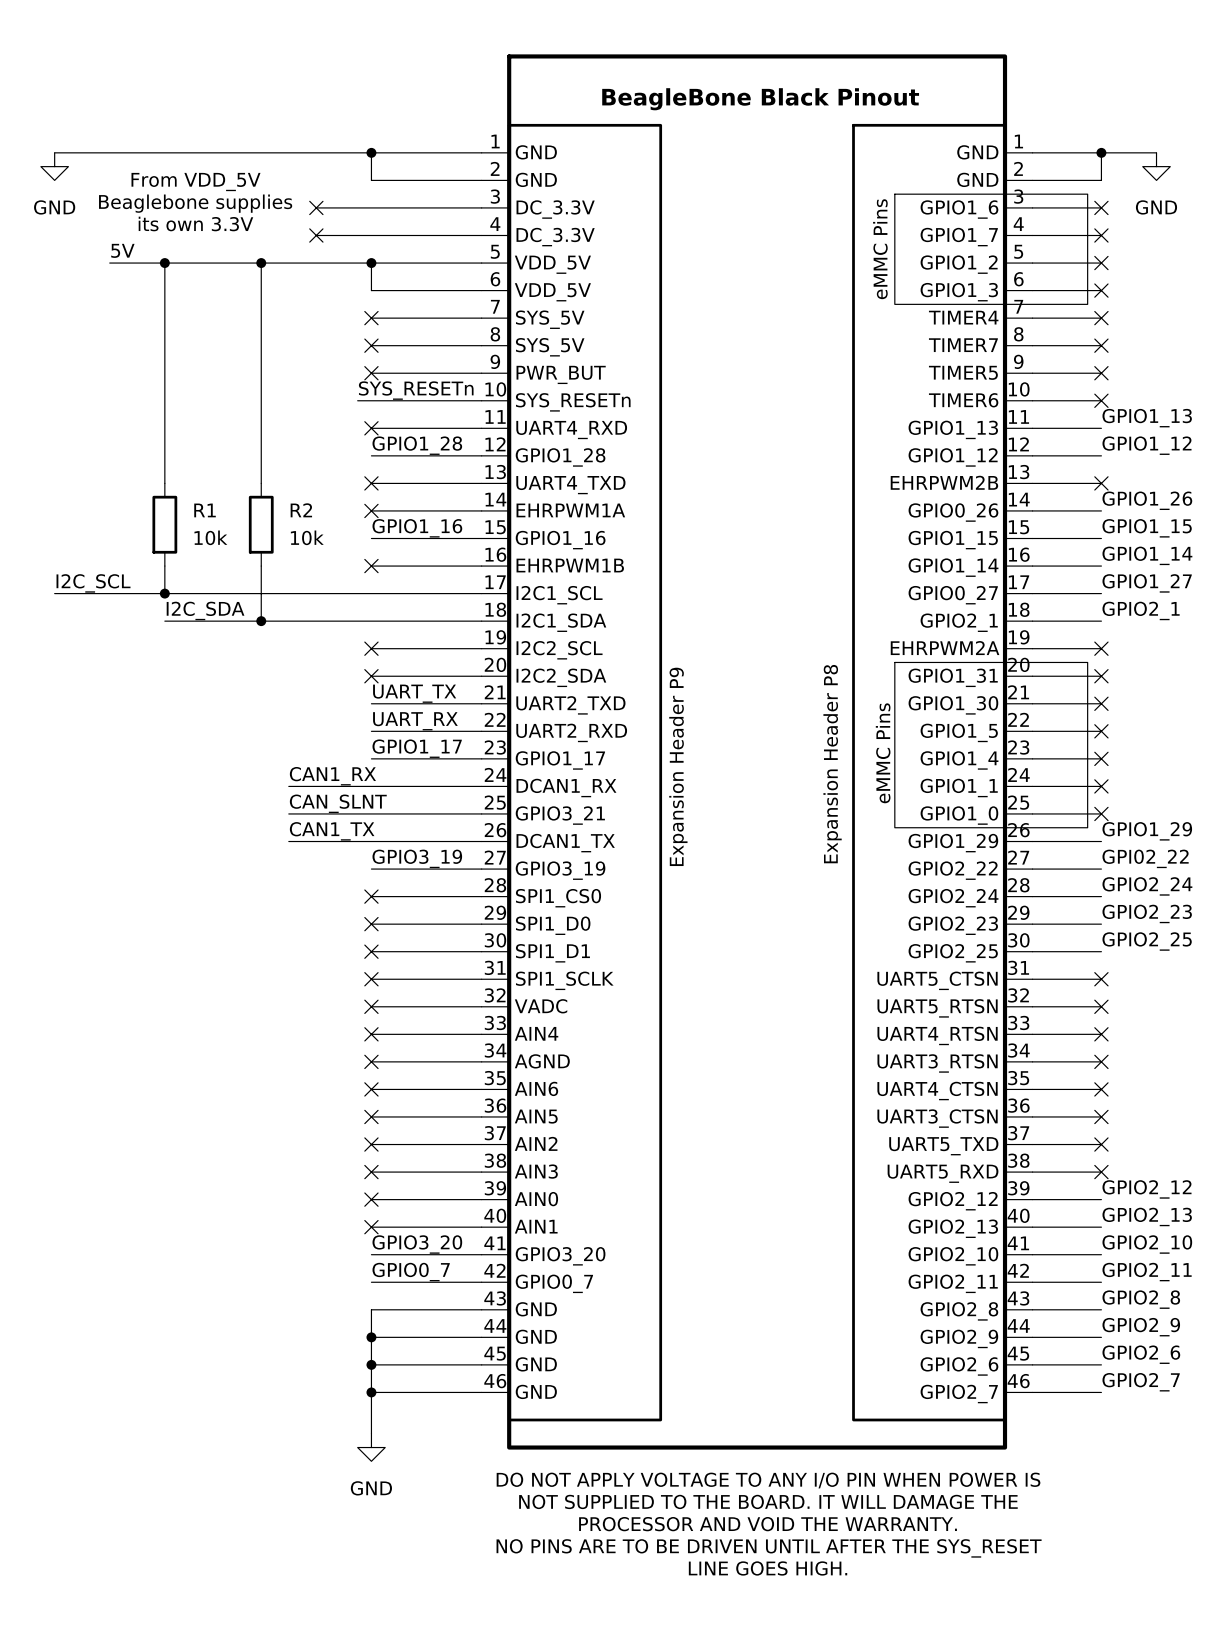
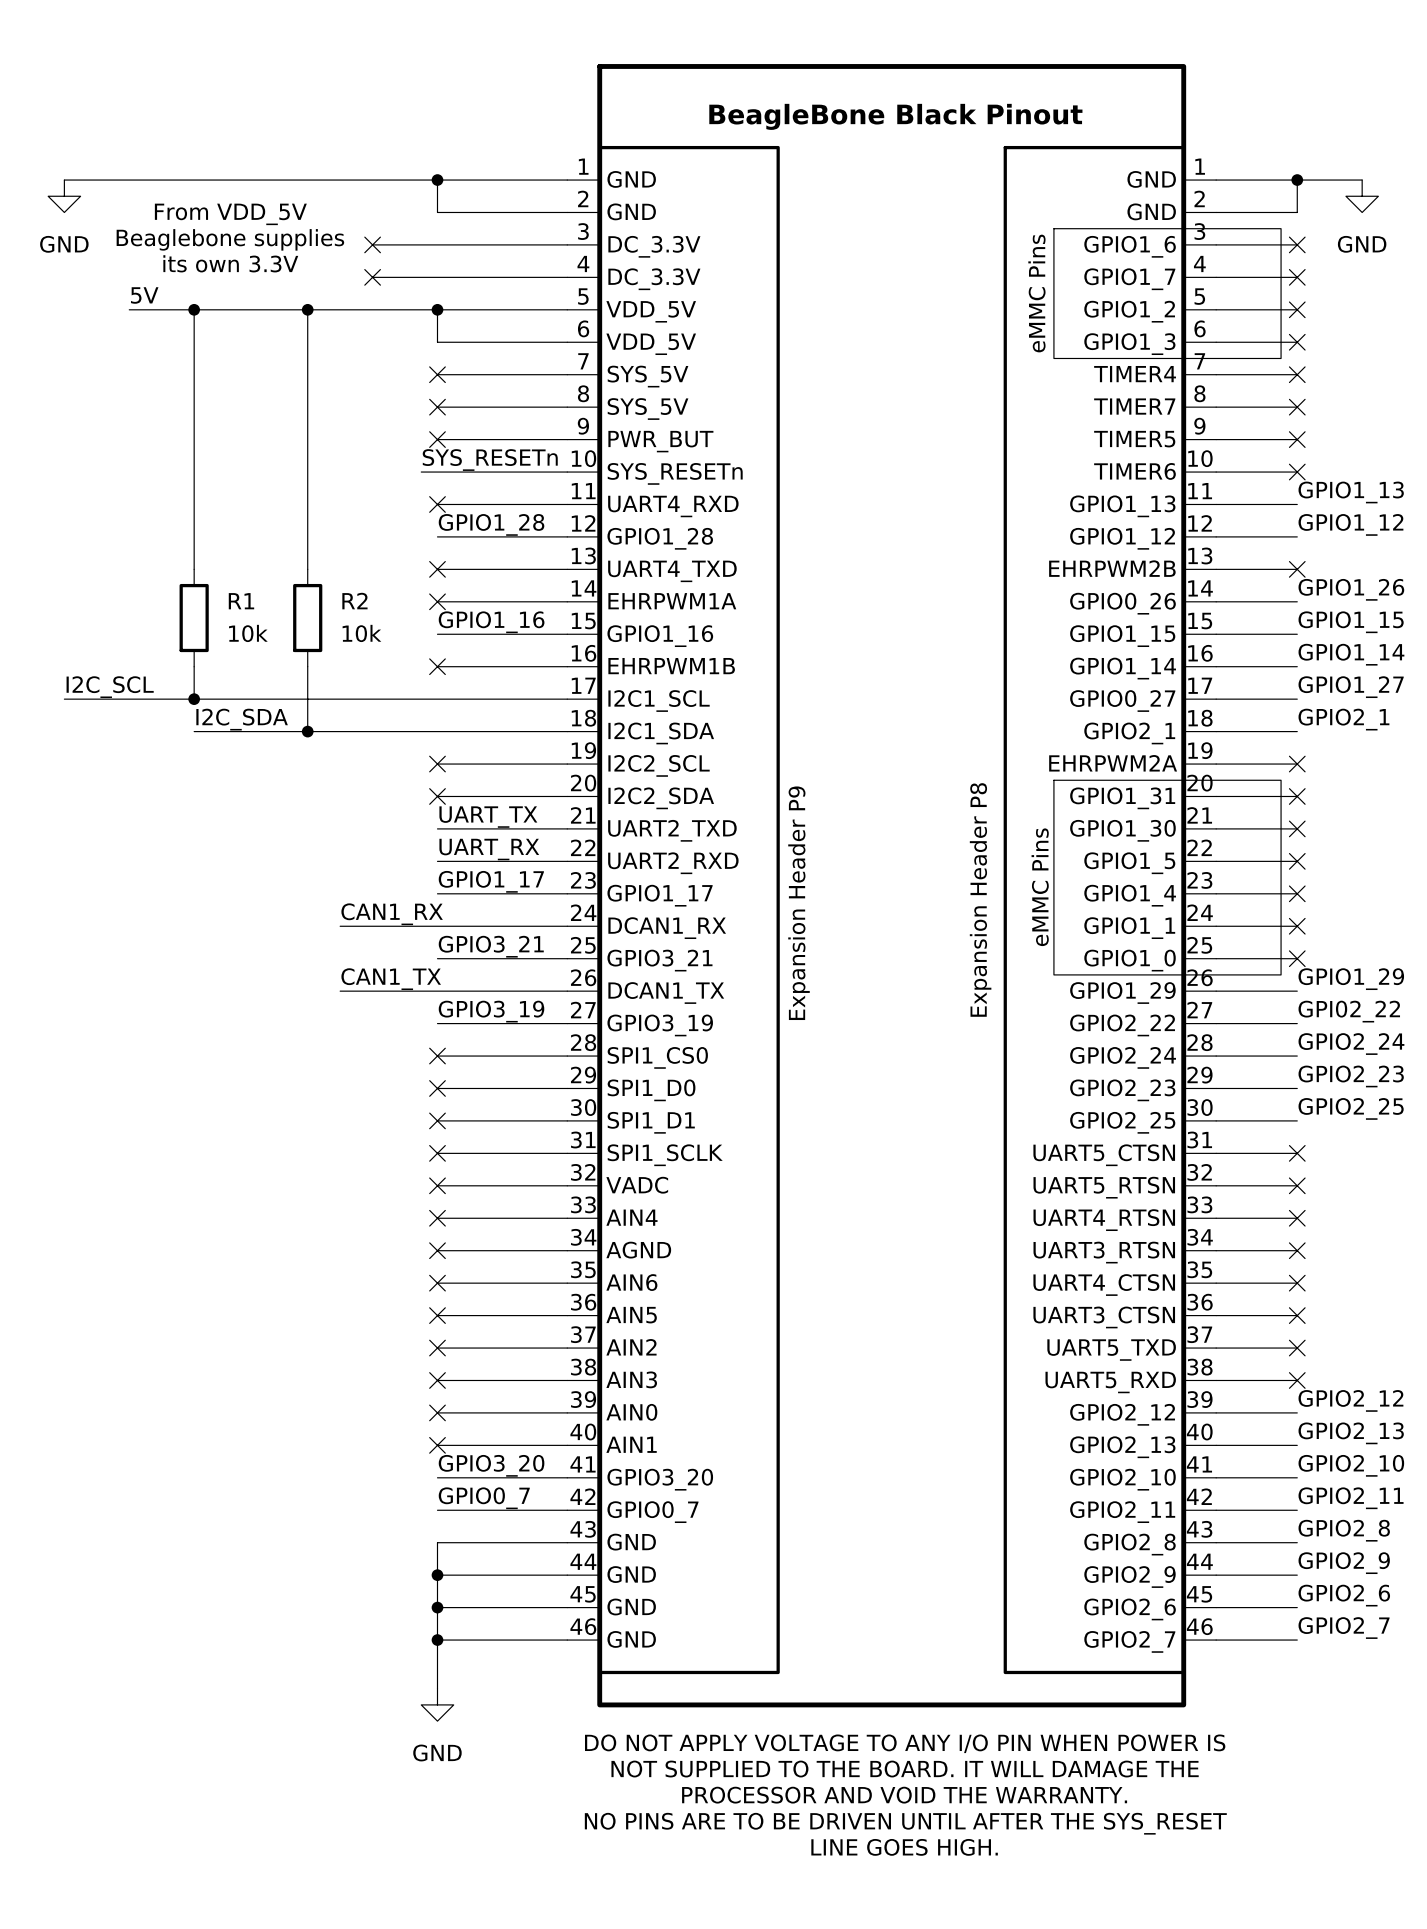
label: CAN_SLNT (338, 803) -> none
label: none -> GPIO3_21 (491, 946)
wire: (288, 813) (371, 813) -> none

